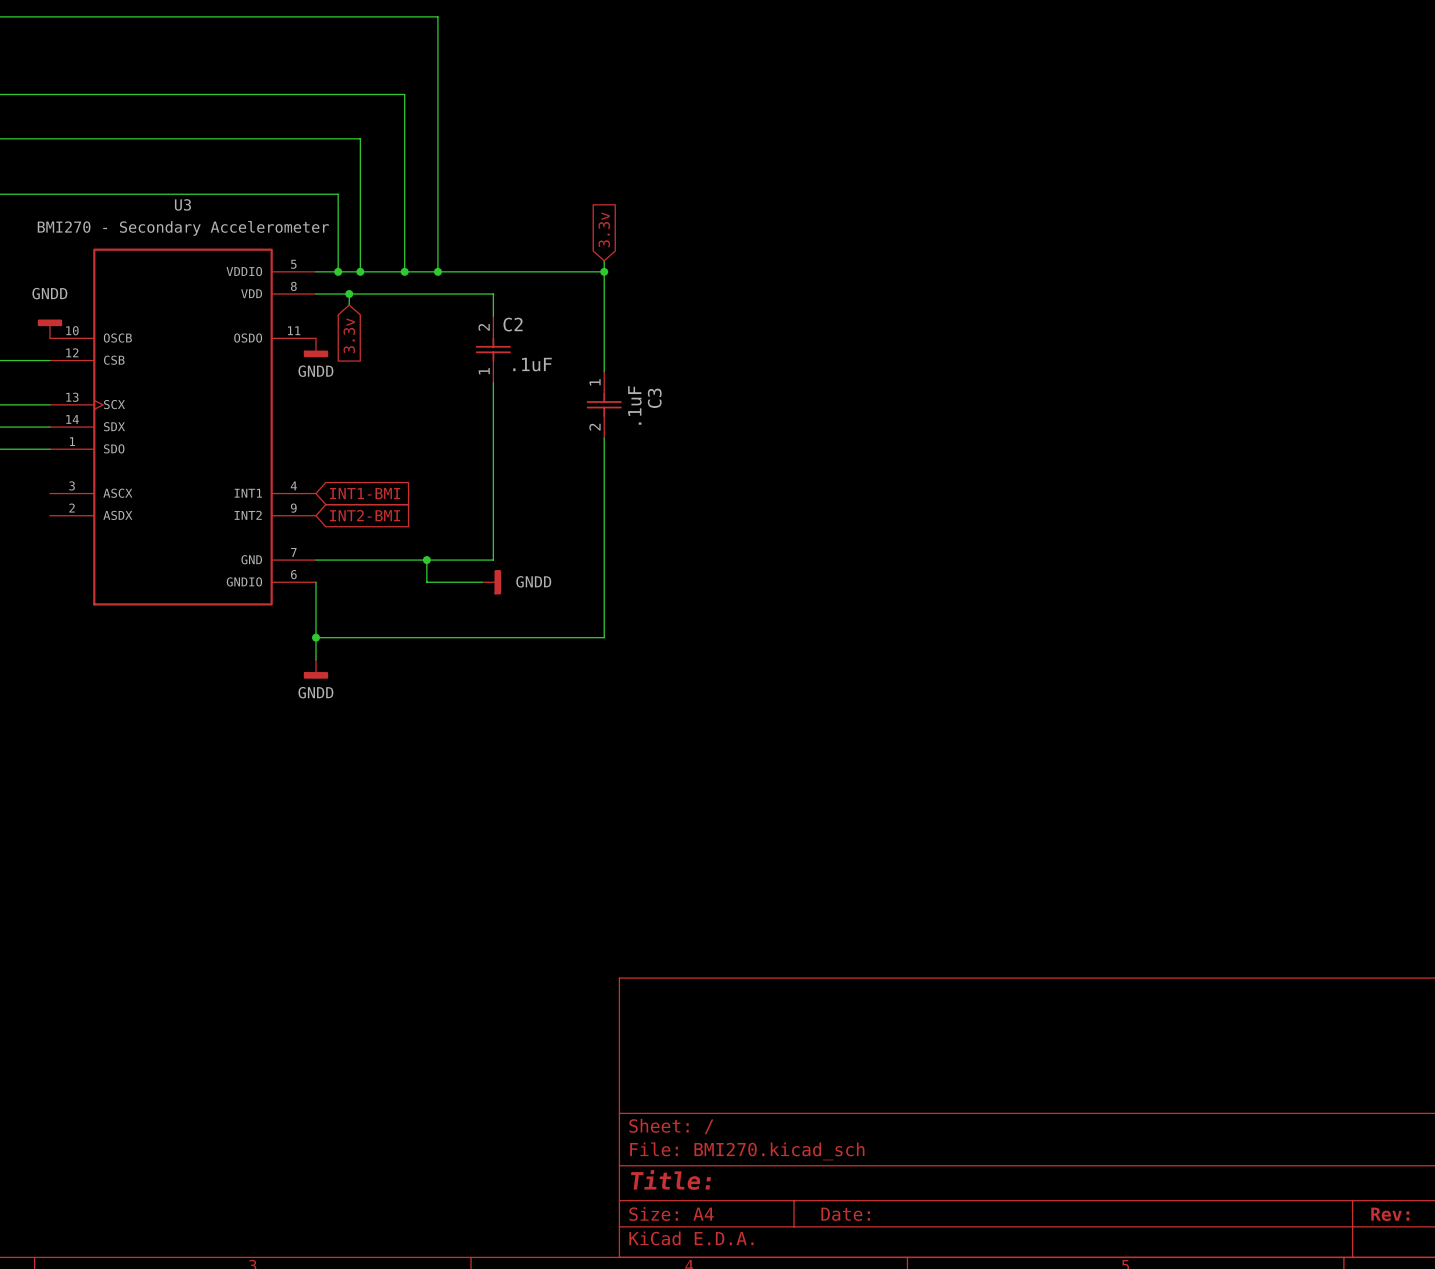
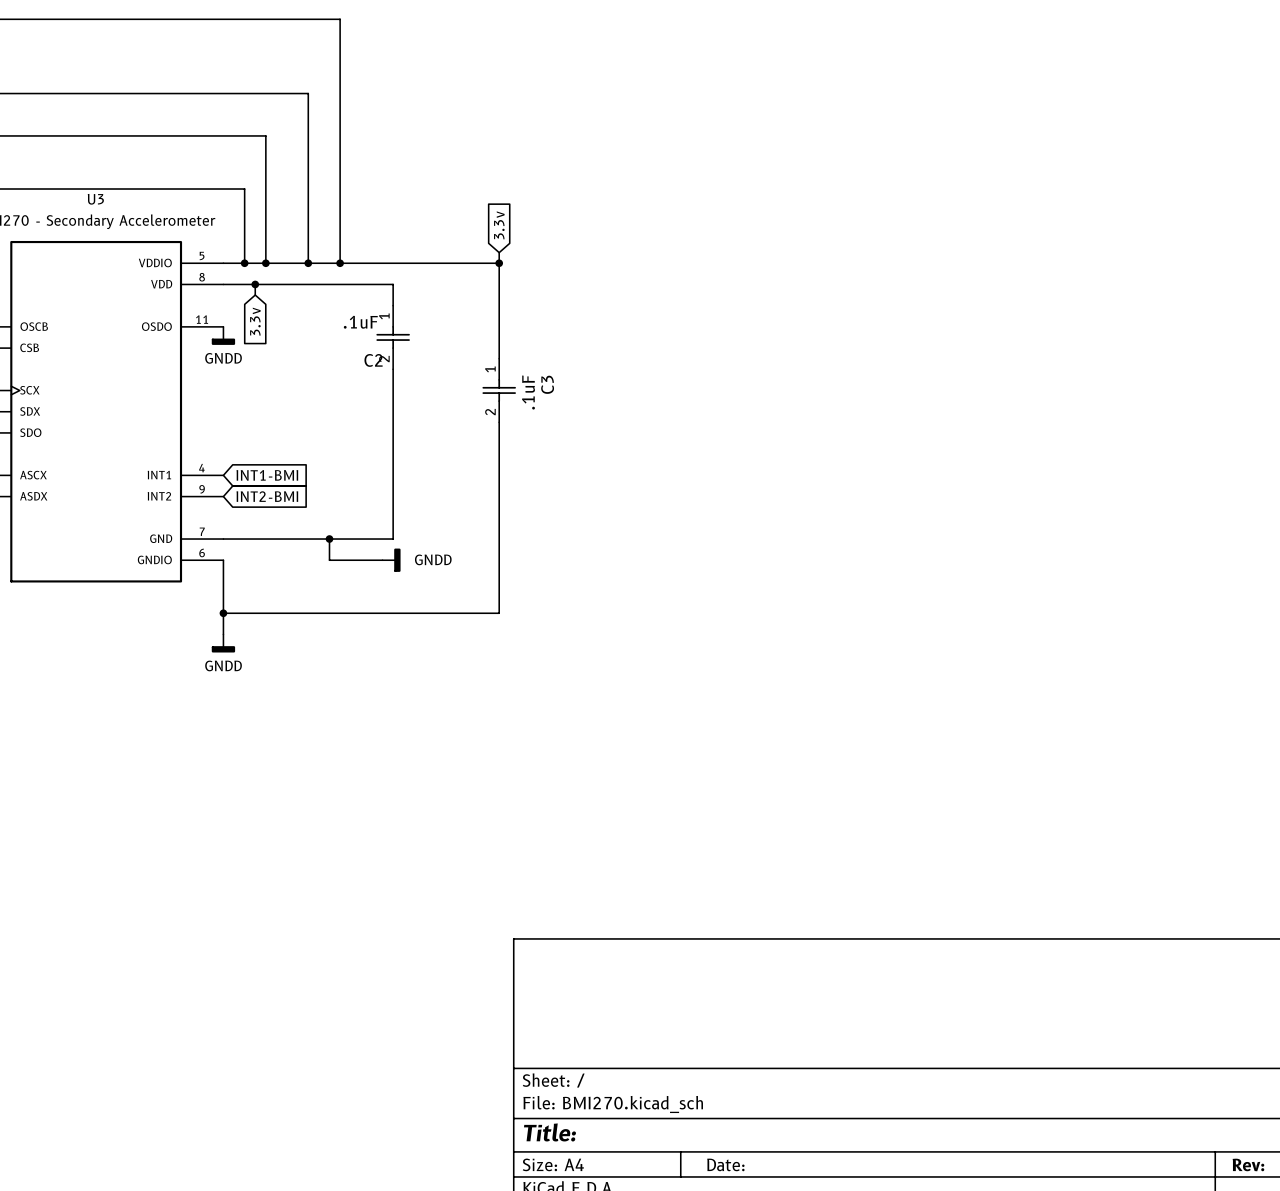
C2 rotation: 0° (493, 349) -> 180° (393, 337)

